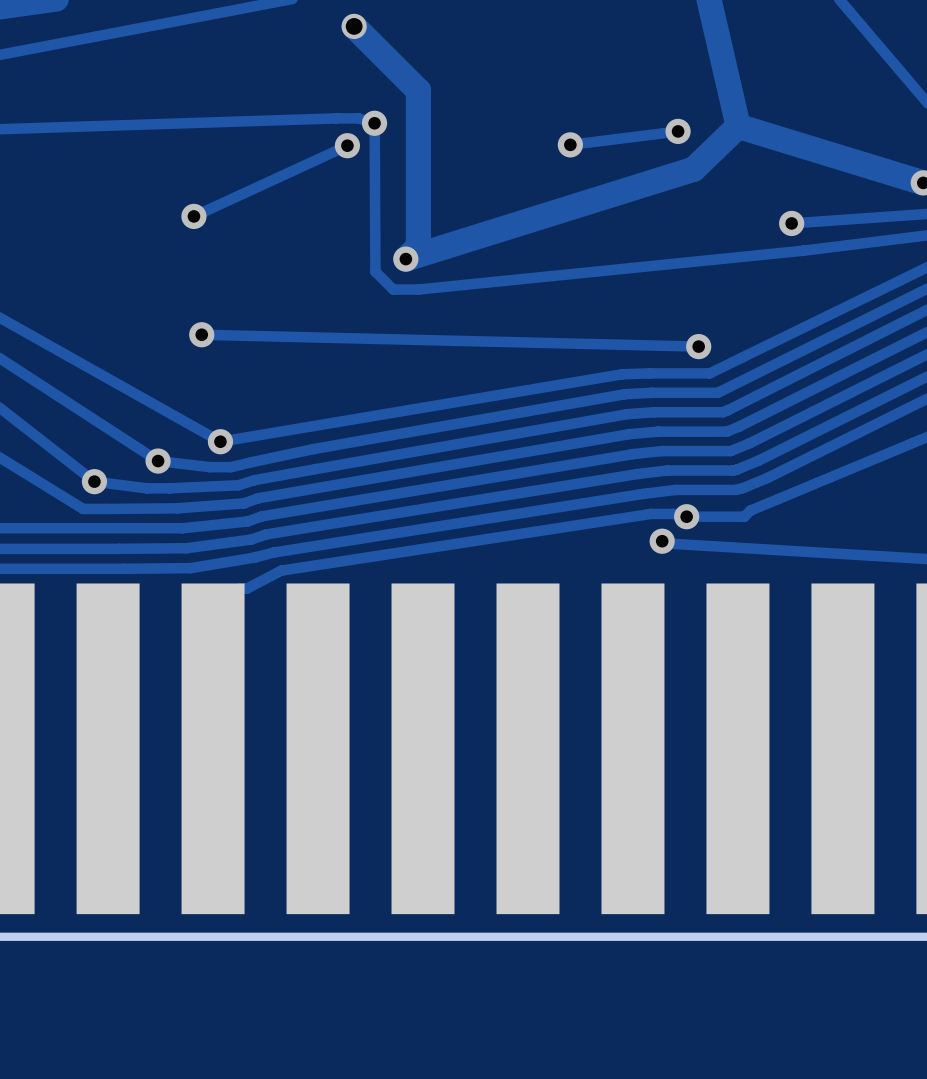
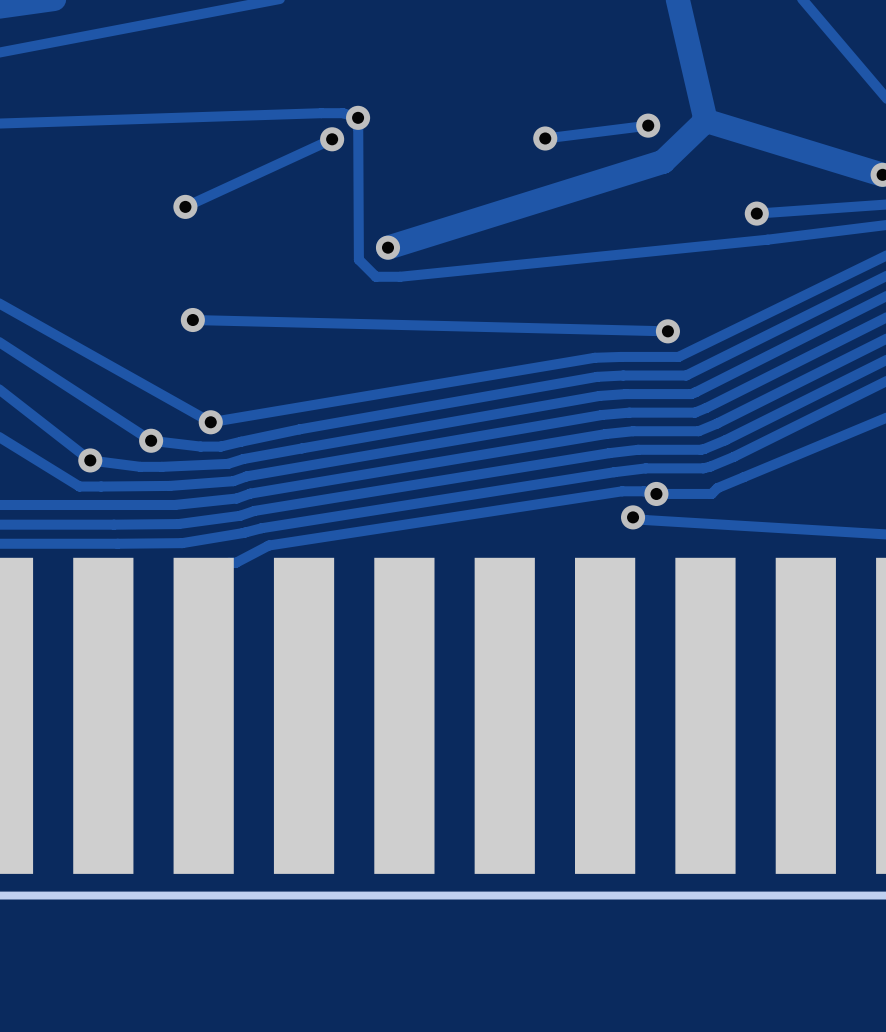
track: (354, 26) (418, 90) (418, 246) (405, 259) -> none
via: (354, 26) -> none

